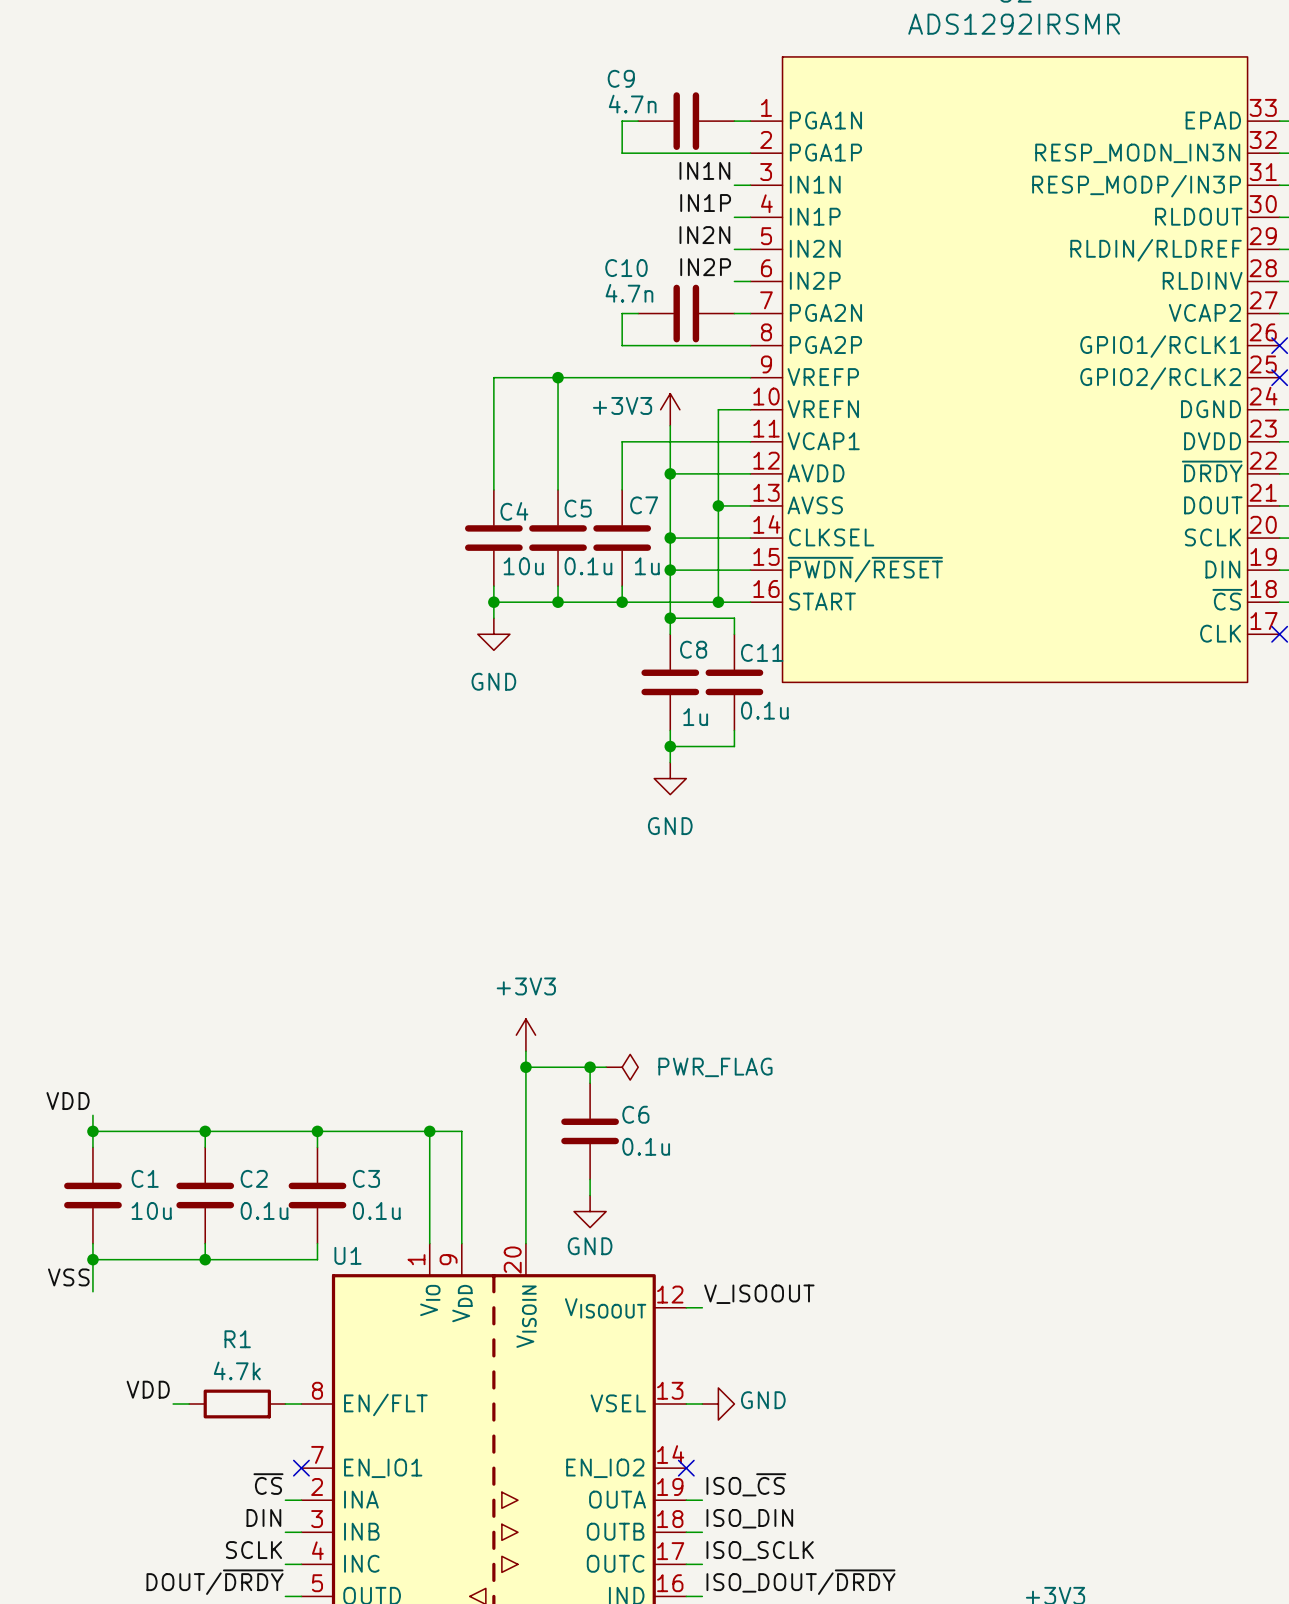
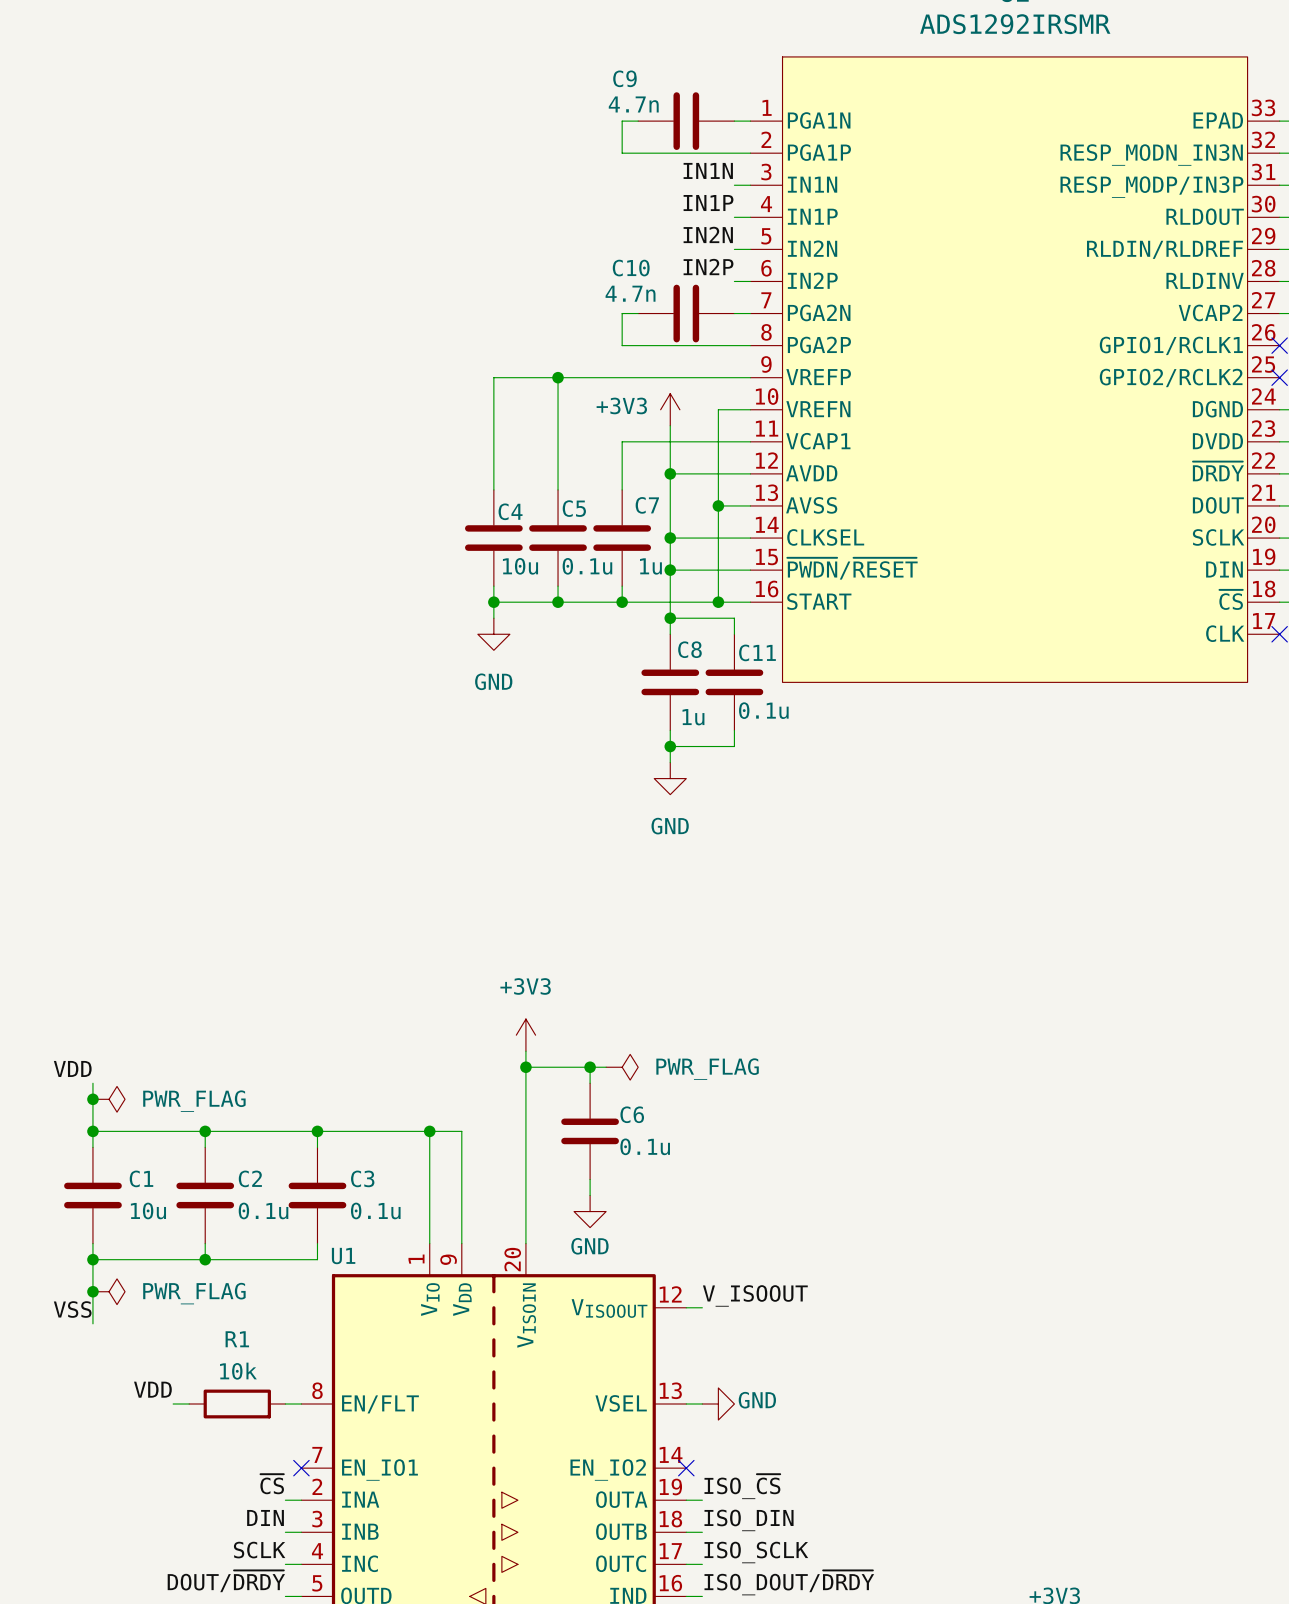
wire: none -> (92, 1083) (92, 1115)
junction: none -> (92, 1099)
power symbol: none -> PWR_FLAG (109, 1099)
label position: VDD (68, 1101) -> VDD (72, 1068)
label position: VSS (68, 1277) -> VSS (72, 1309)
wire: none -> (92, 1291) (92, 1323)
junction: none -> (92, 1291)
power symbol: none -> PWR_FLAG (109, 1291)
R1 value: 4.7k (237, 1370) -> 10k (238, 1371)

